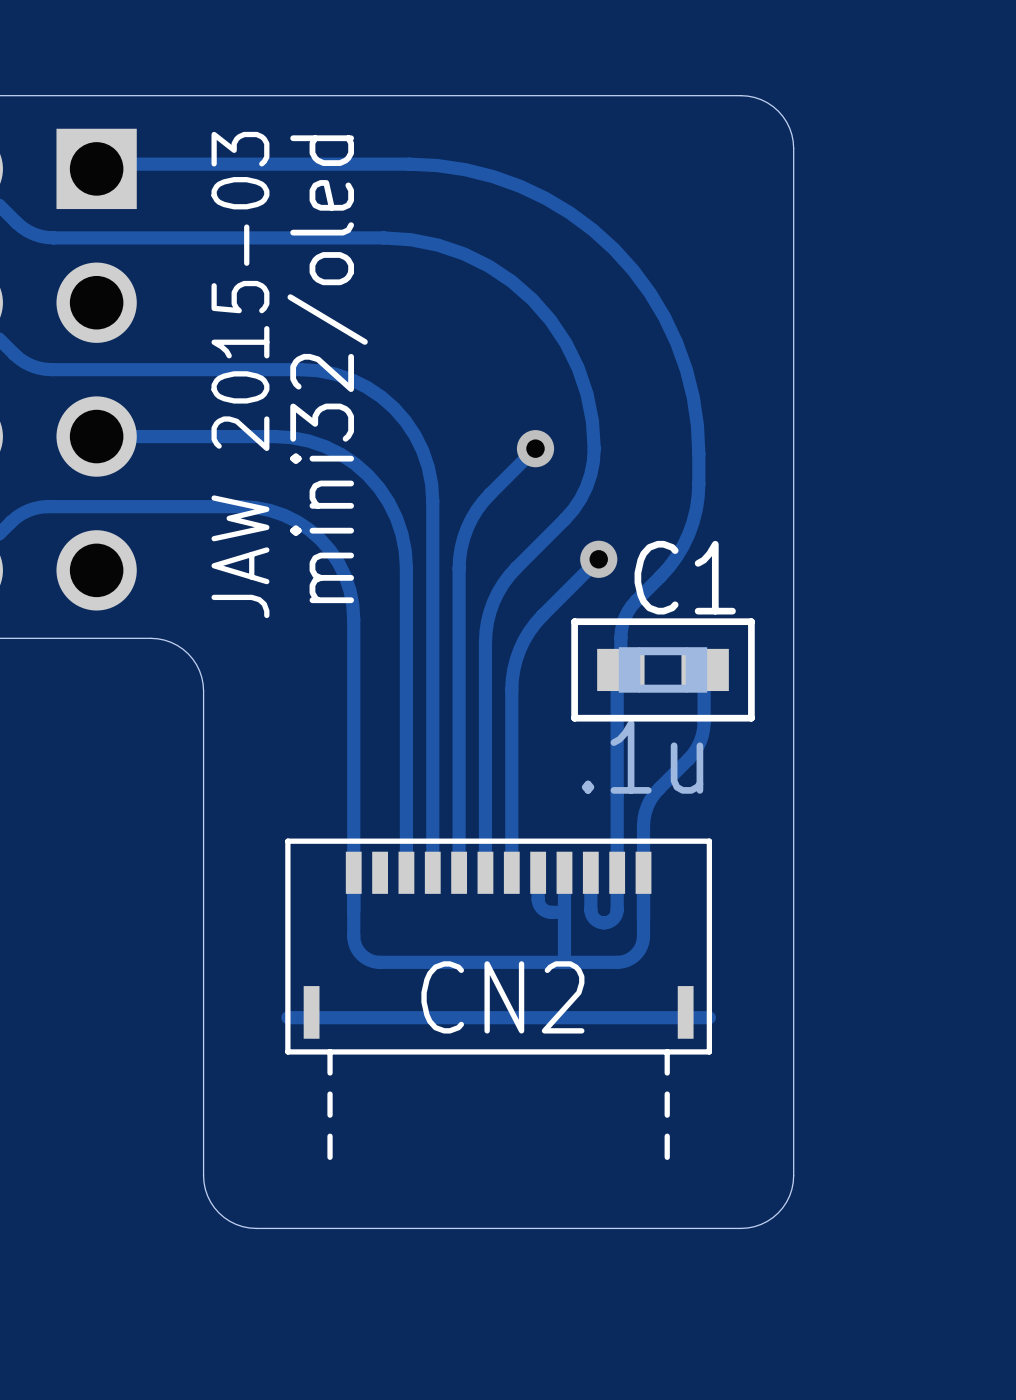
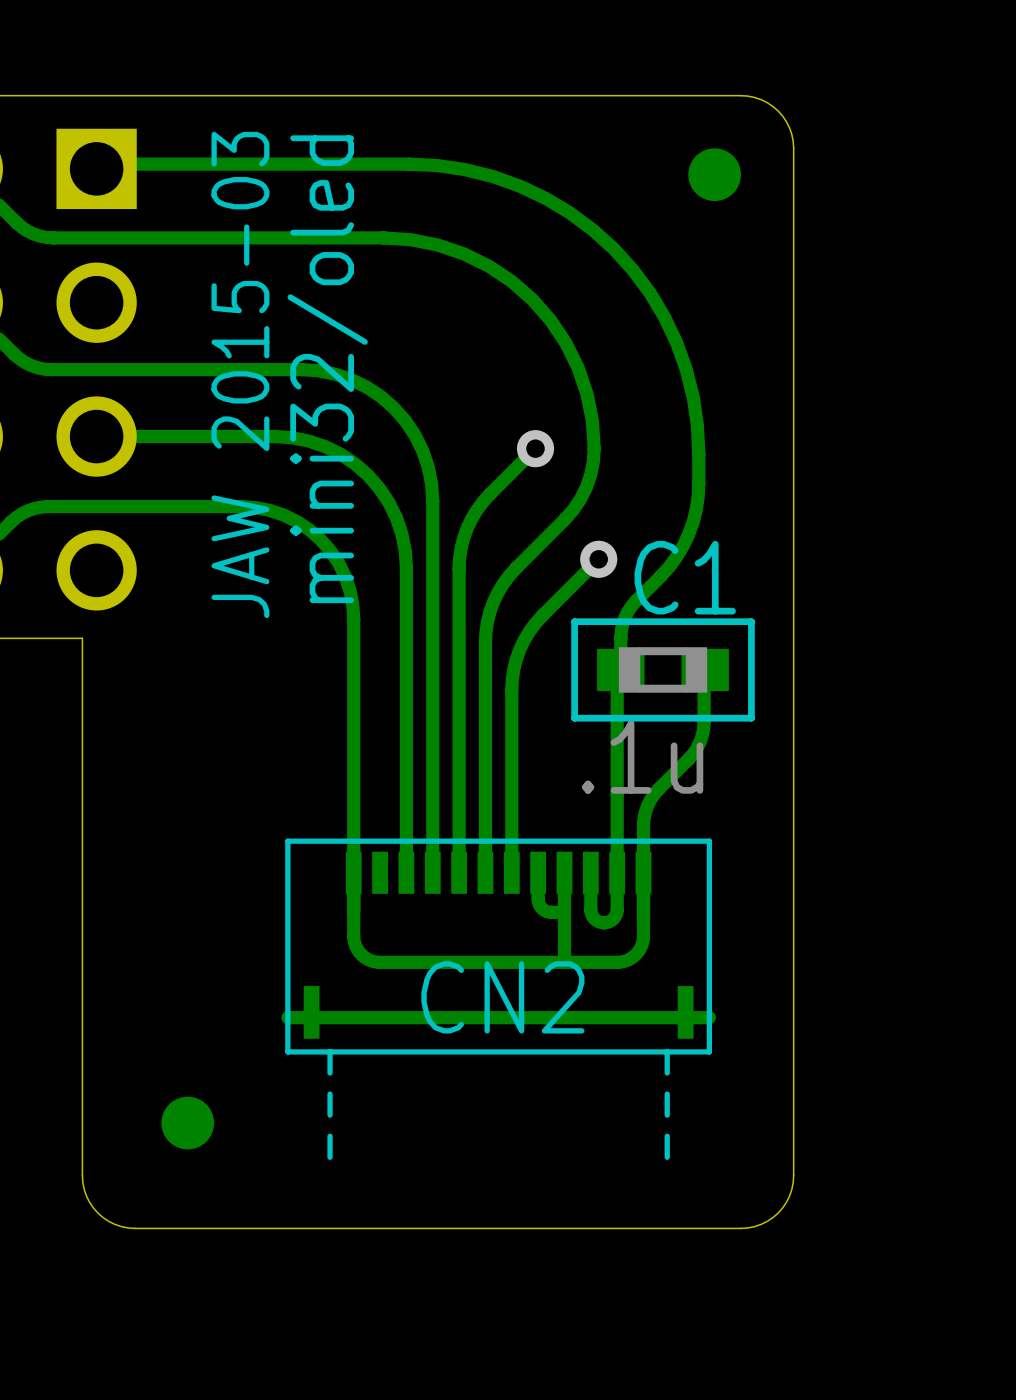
part: none -> (714, 174)
board edge: (82, 638) (164, 640) (177, 645) (188, 653) (196, 664) (201, 677) (203, 691) (204, 1182) (210, 1202) (224, 1217) (236, 1224) (256, 1228) -> (82, 638) (82, 1175) (84, 1189) (89, 1202) (97, 1212) (108, 1221) (121, 1226) (135, 1228) (256, 1228)
part: none -> (187, 1123)

